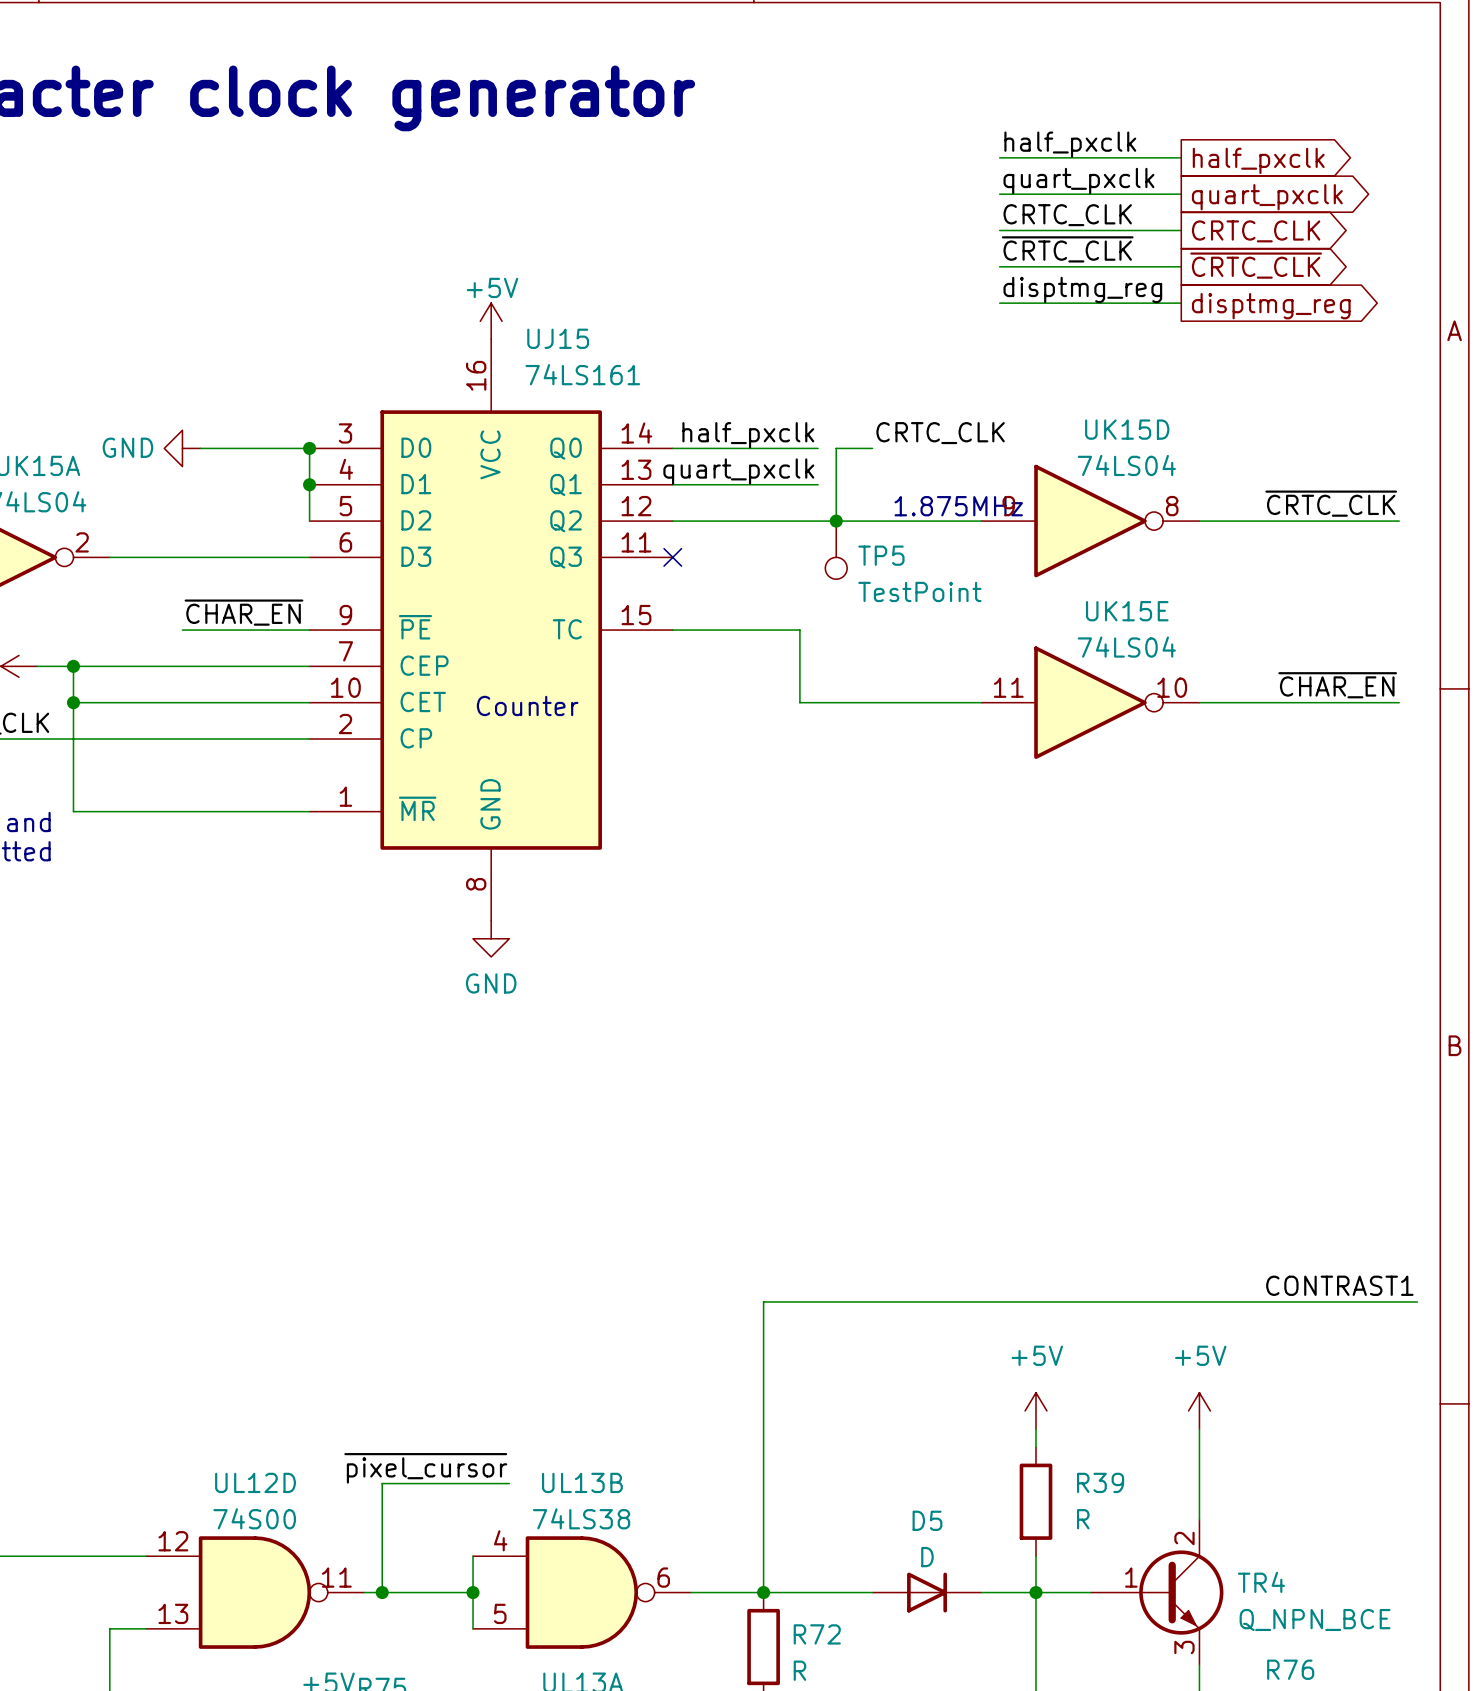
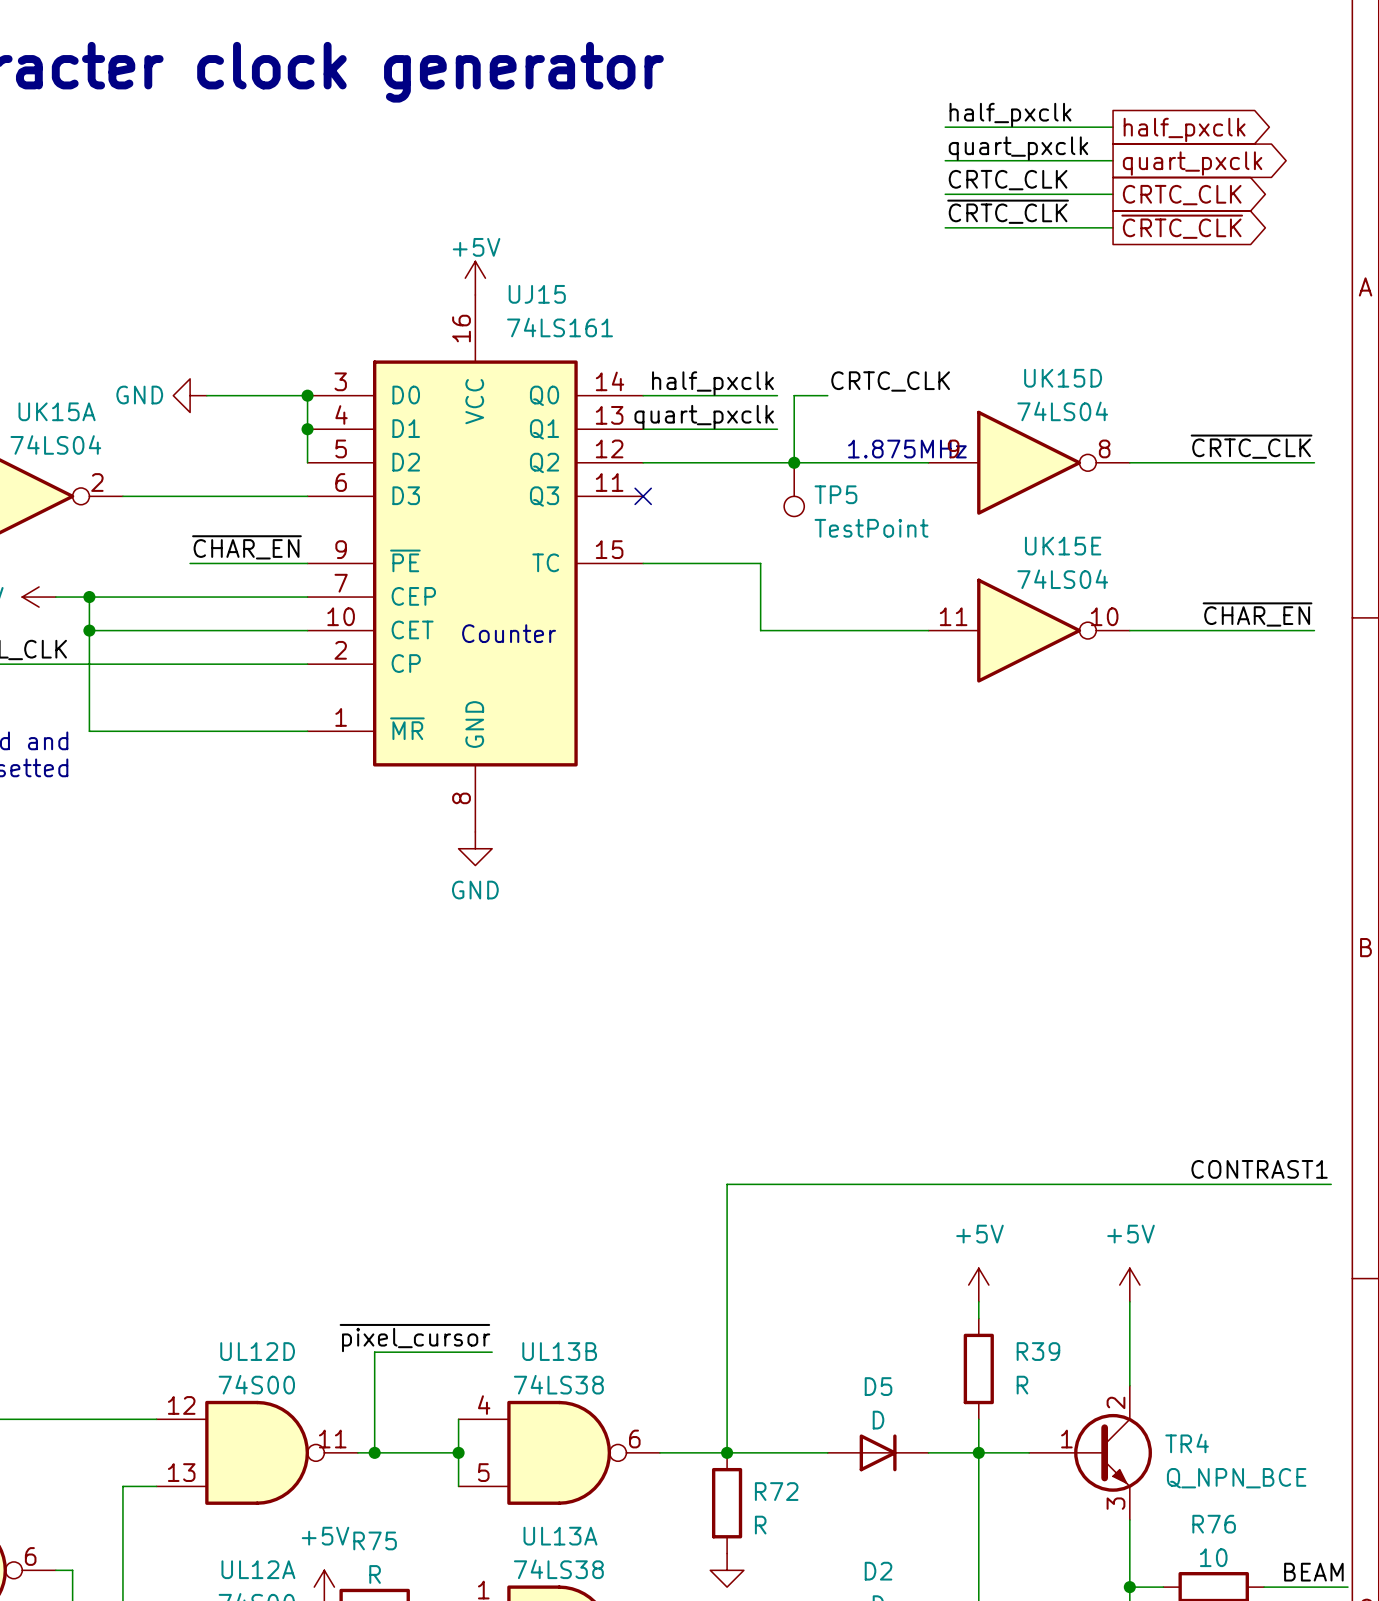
label: disptmg_reg (1082, 289) -> none
wire: (999, 303) (1181, 303) -> none
global label: disptmg_reg (1271, 306) -> none

